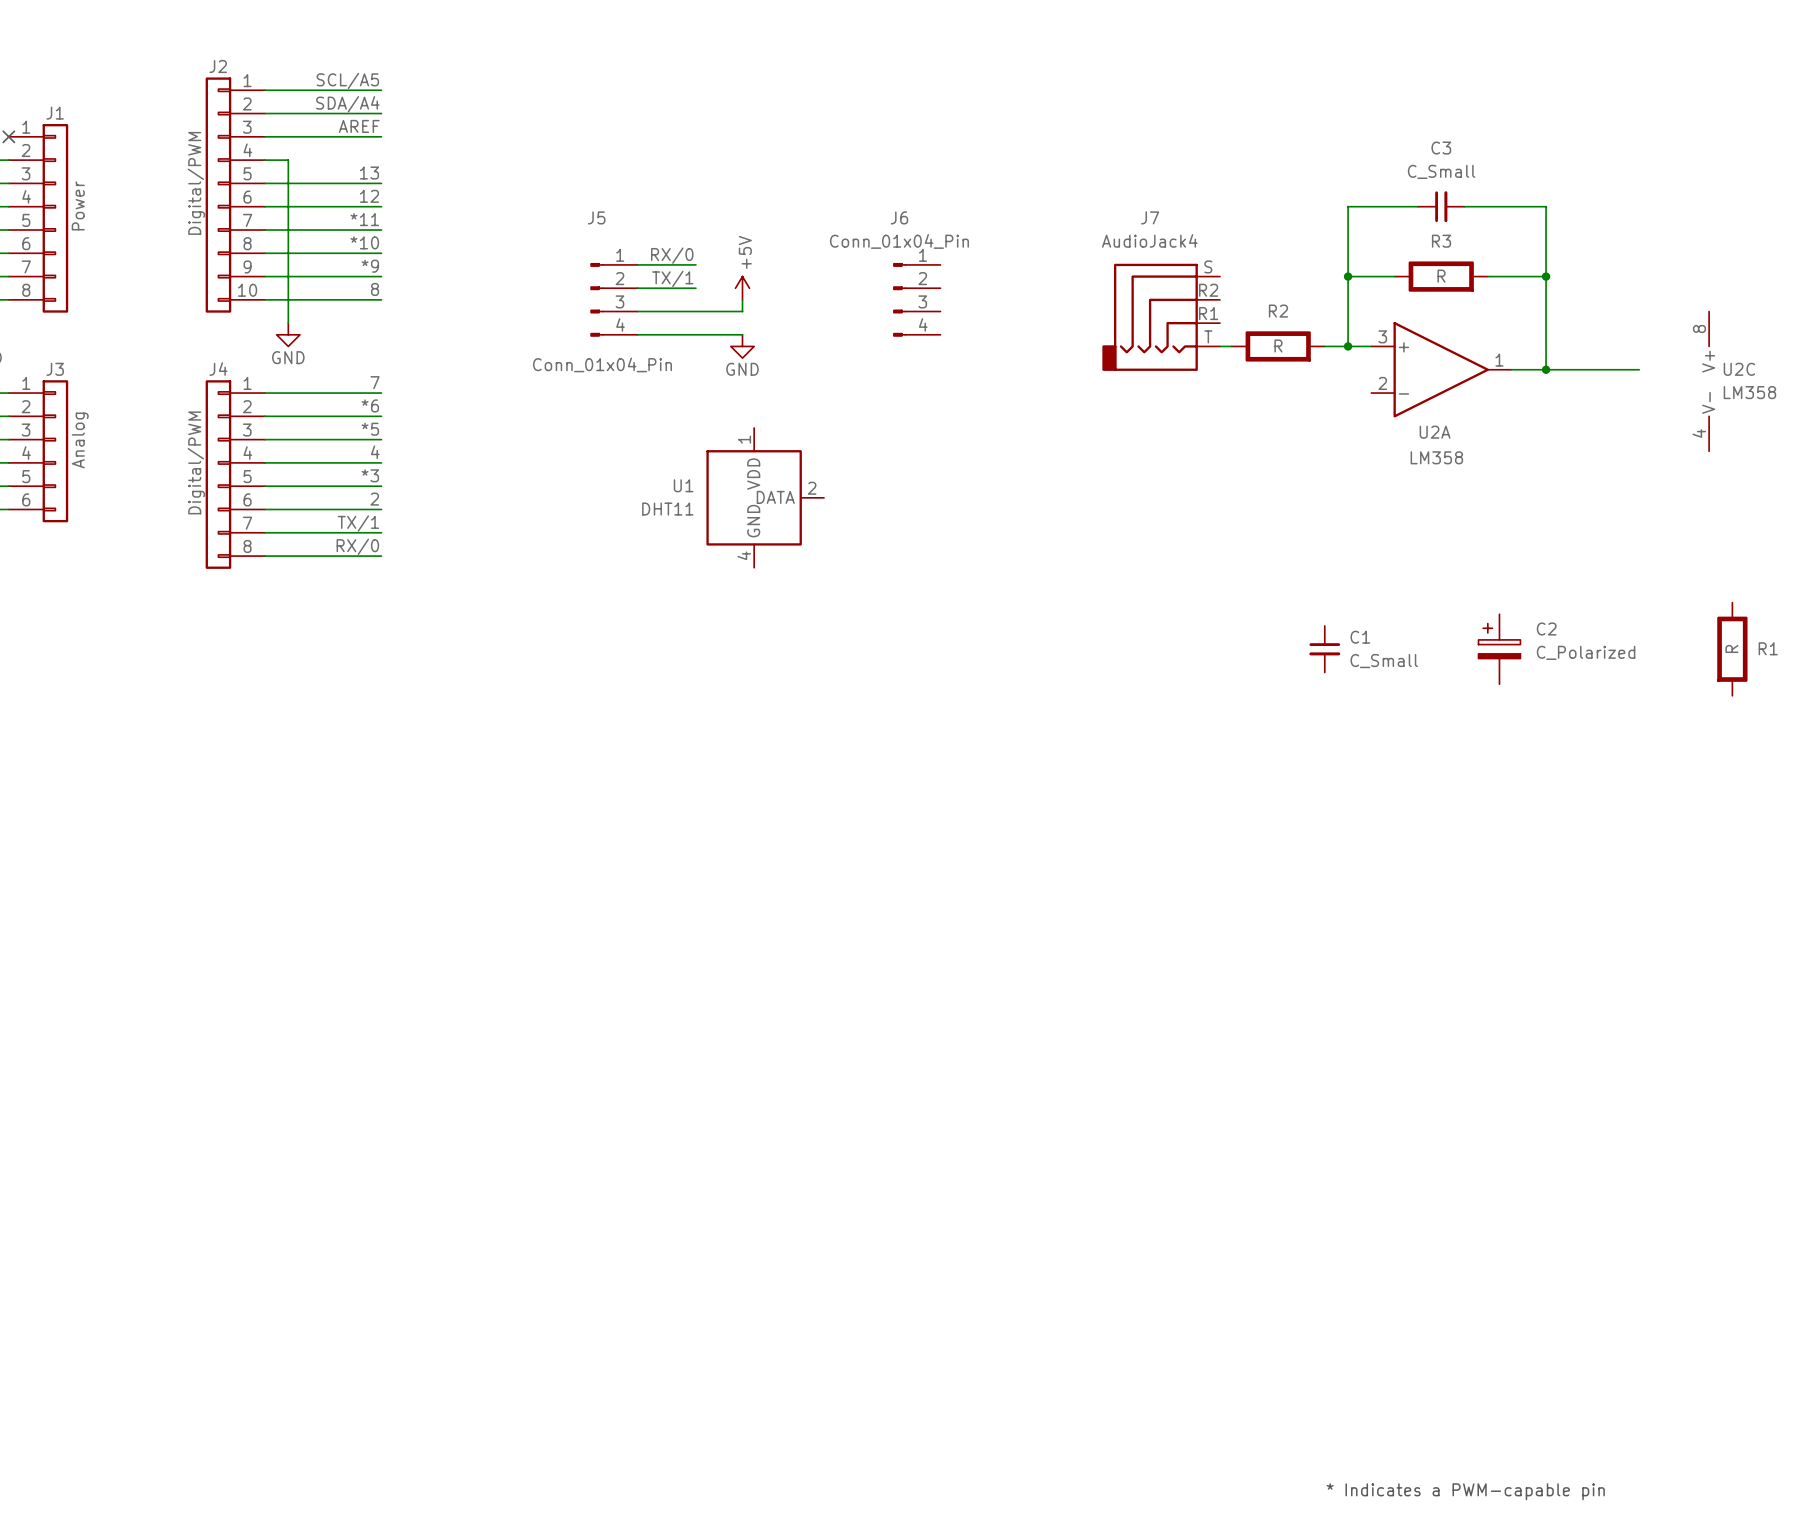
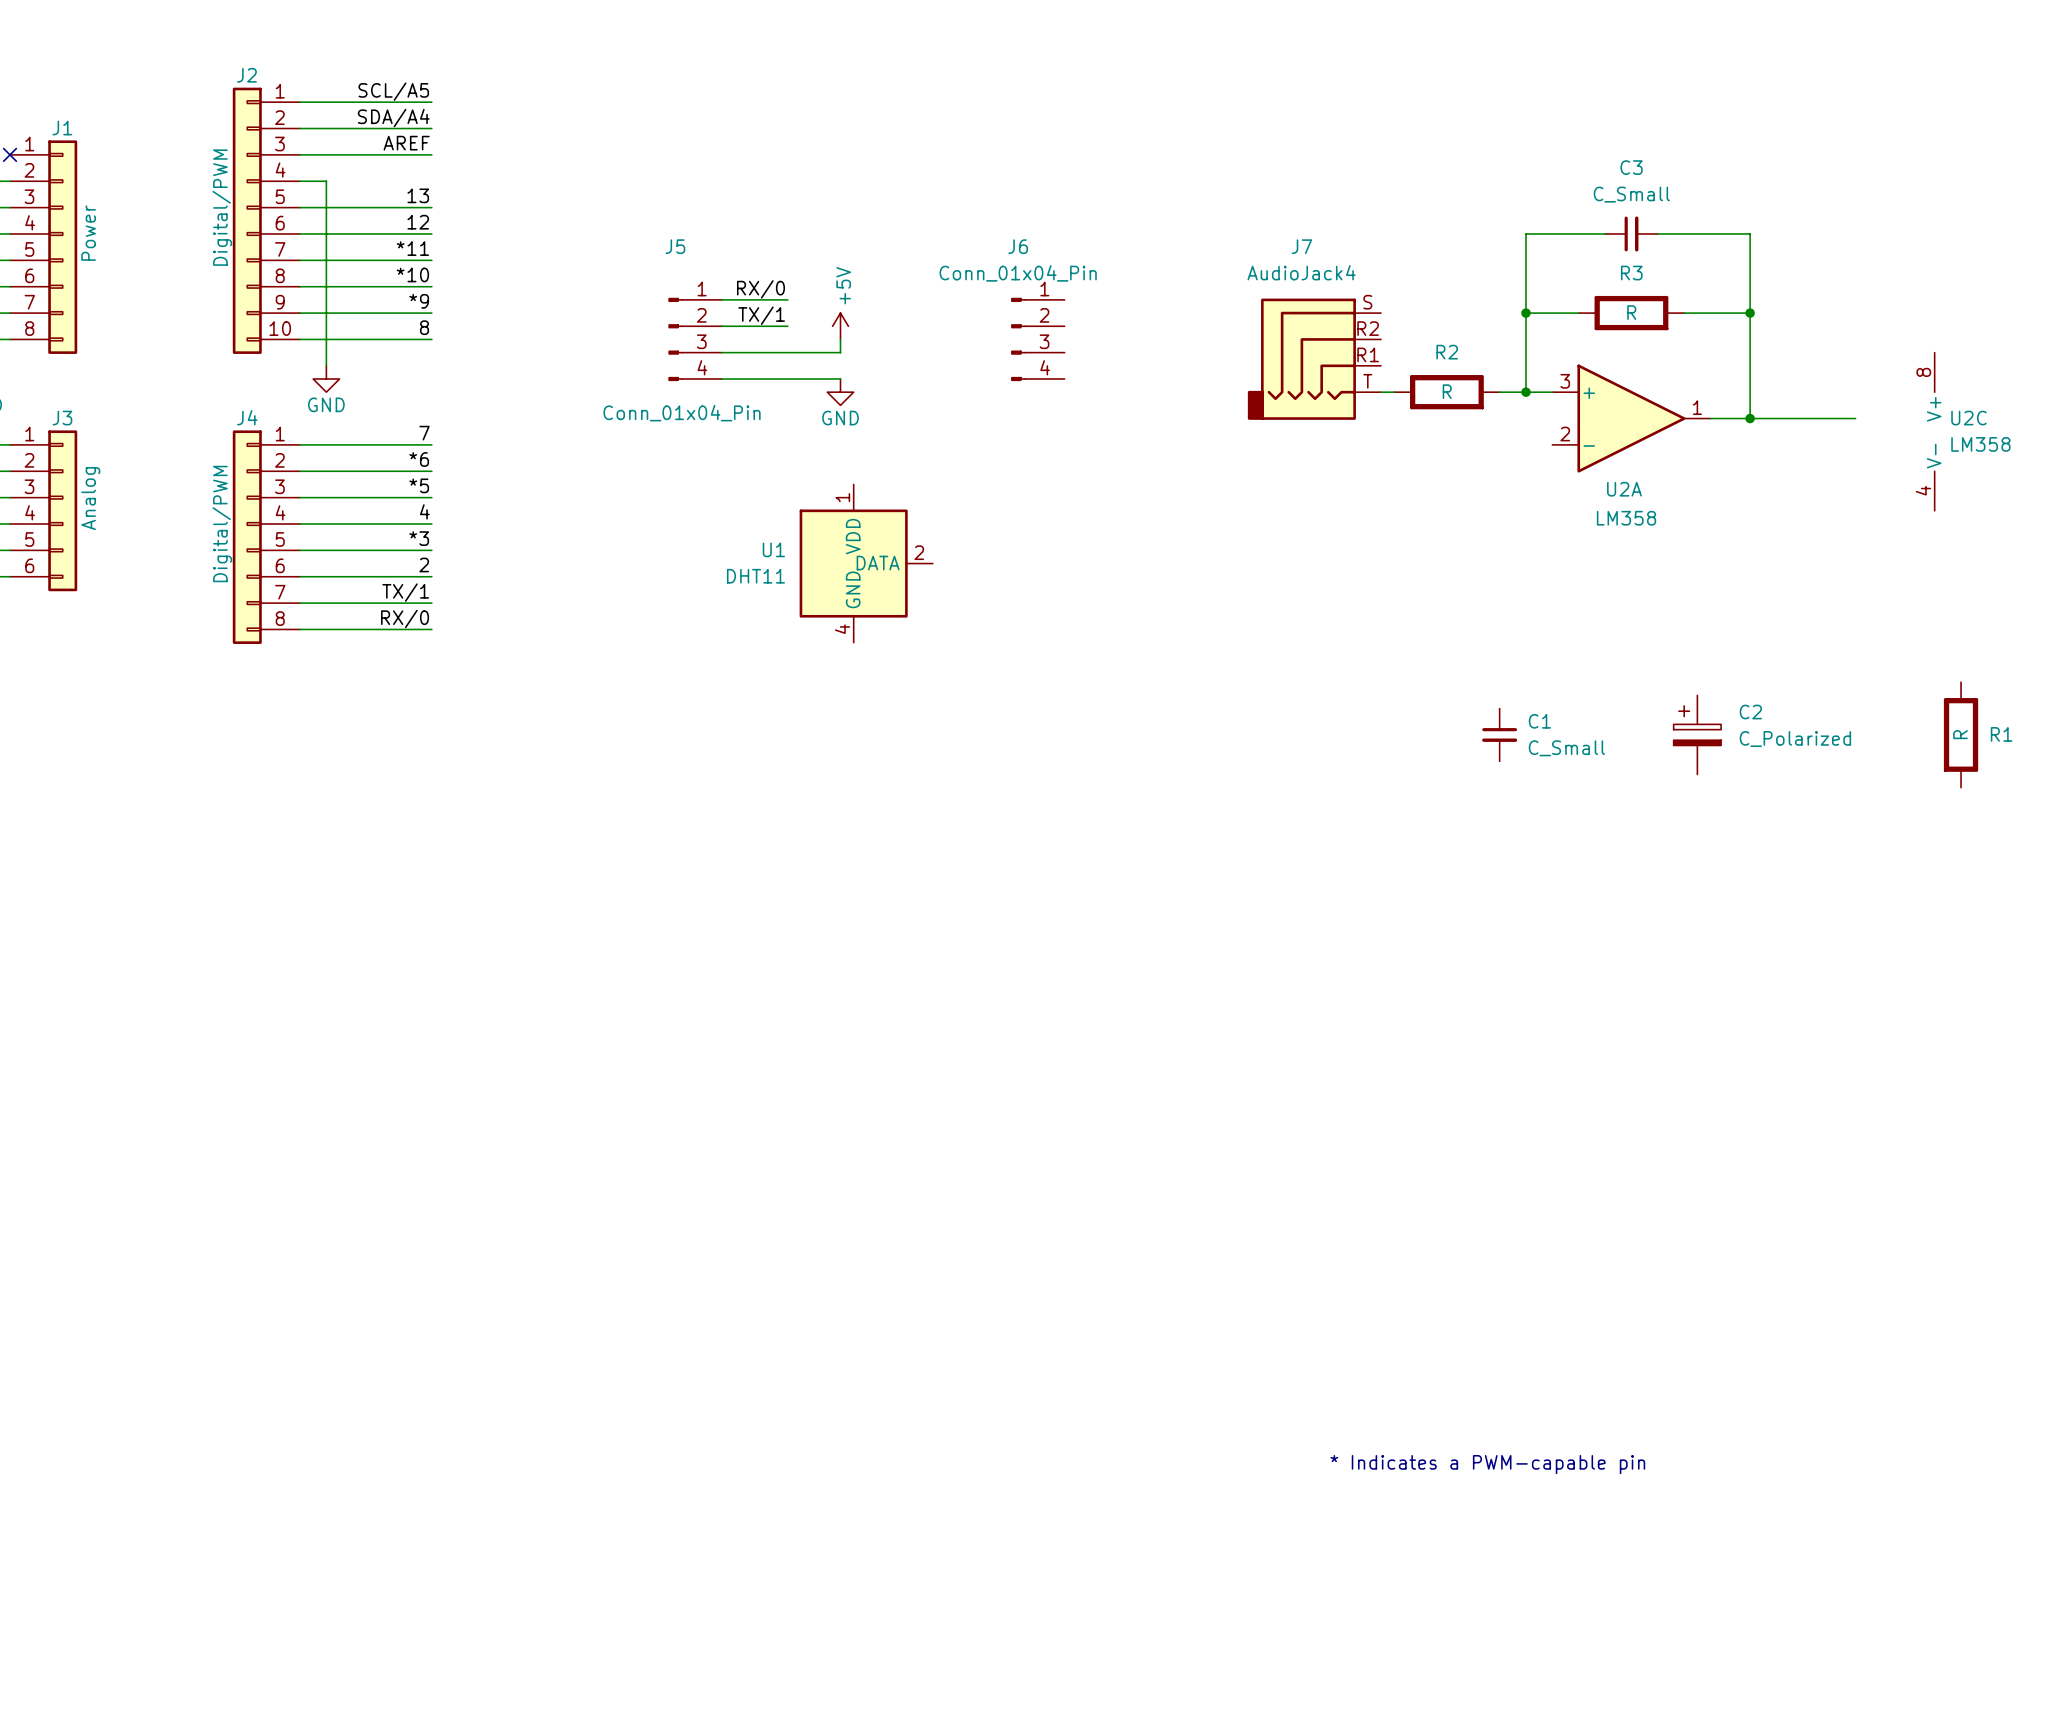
text: none -> * Indicates a PWM-capable pin (1487, 1464)
text: * Indicates a PWM-capable pin (1465, 1491) -> none

